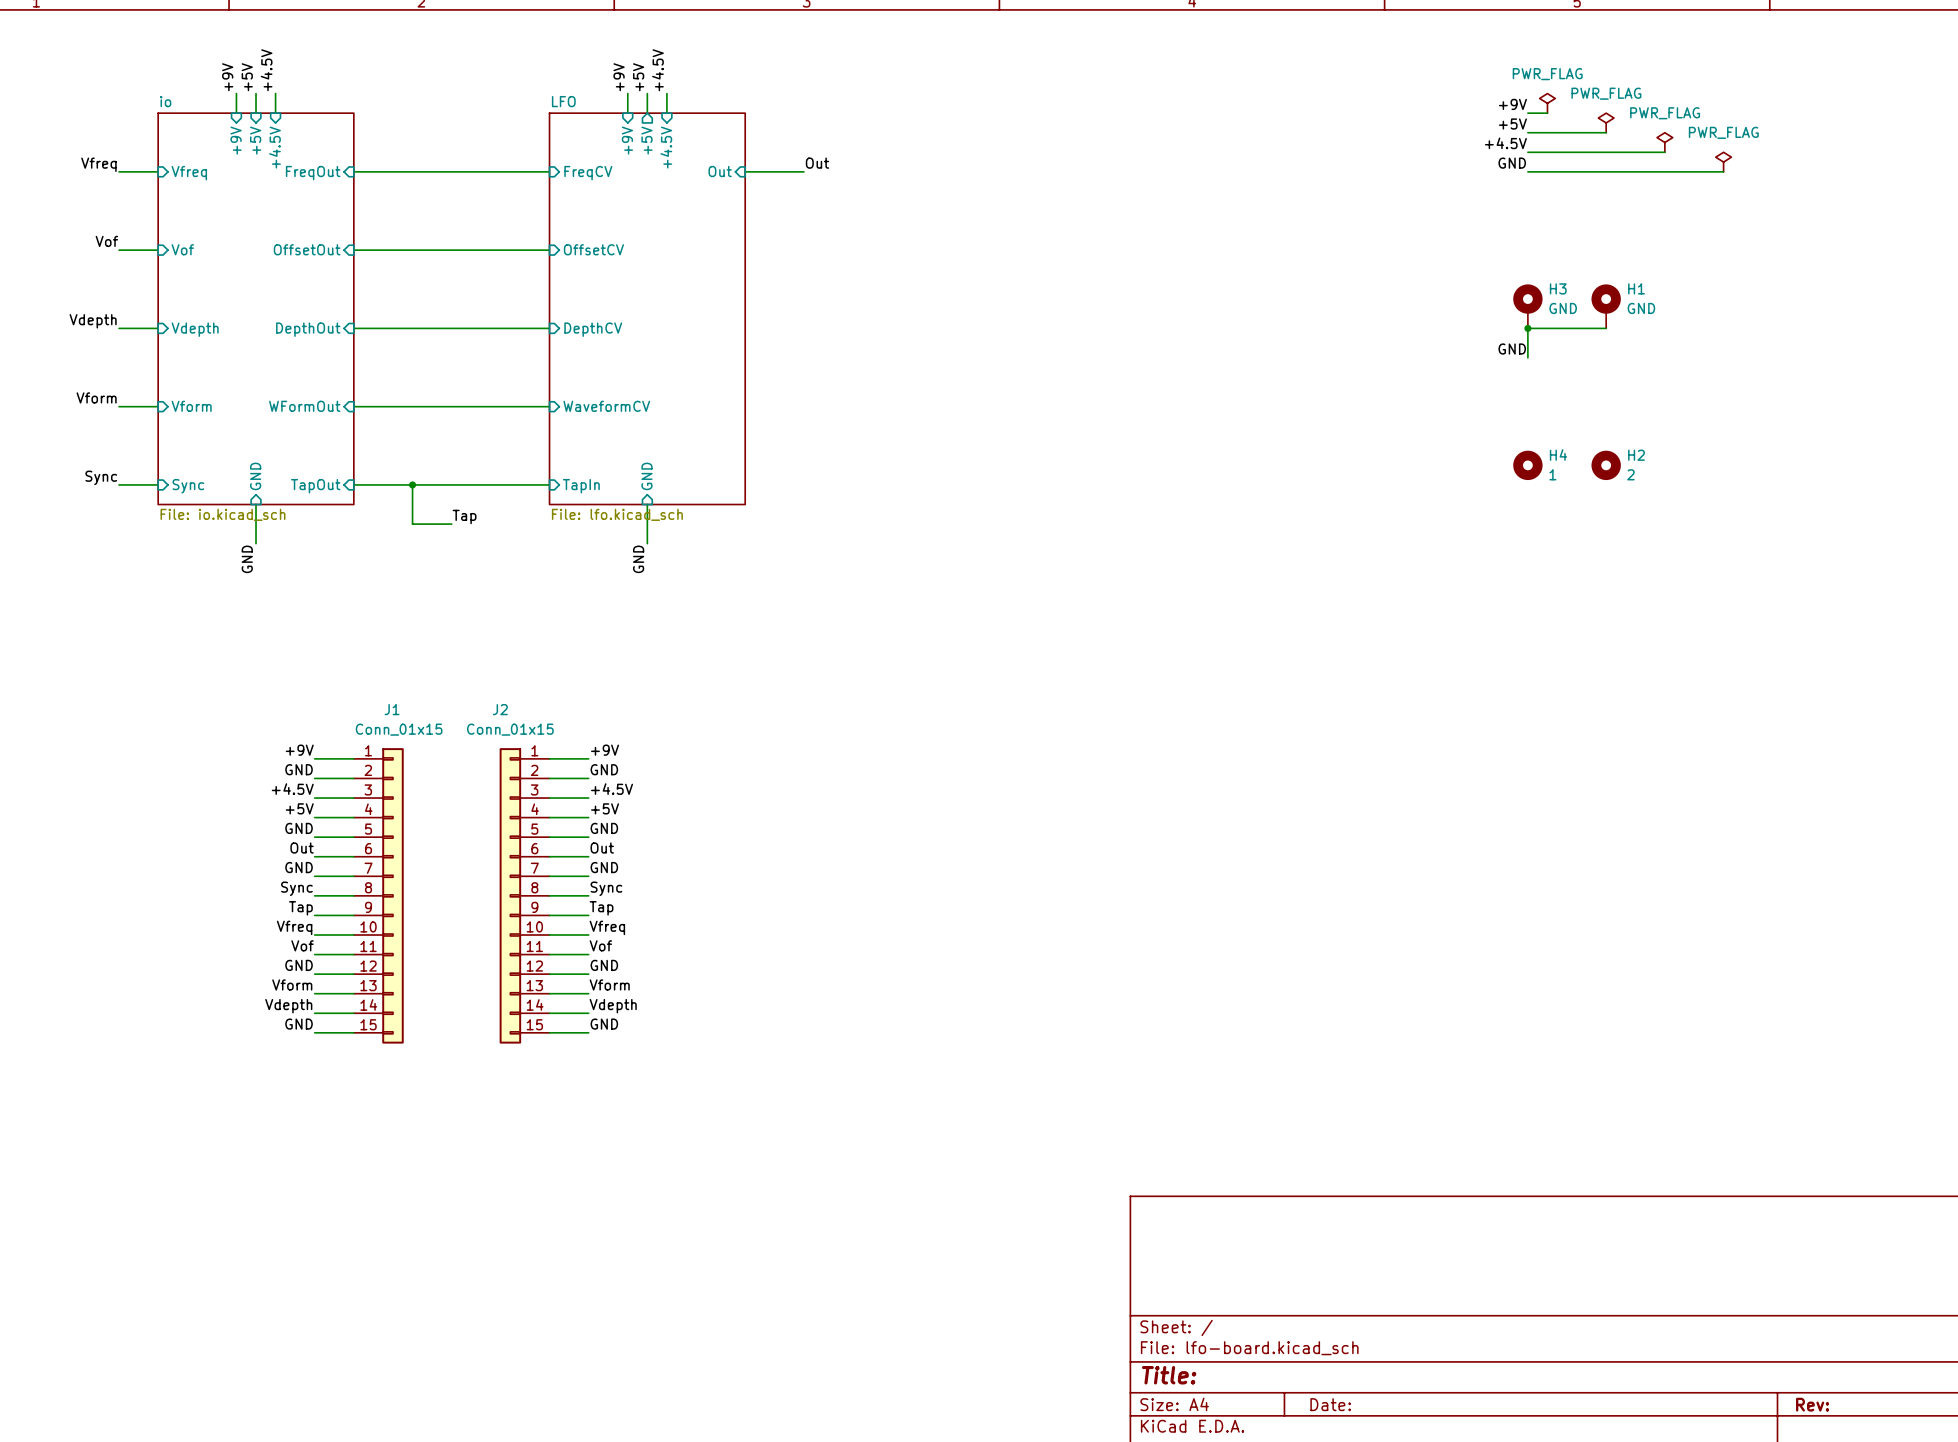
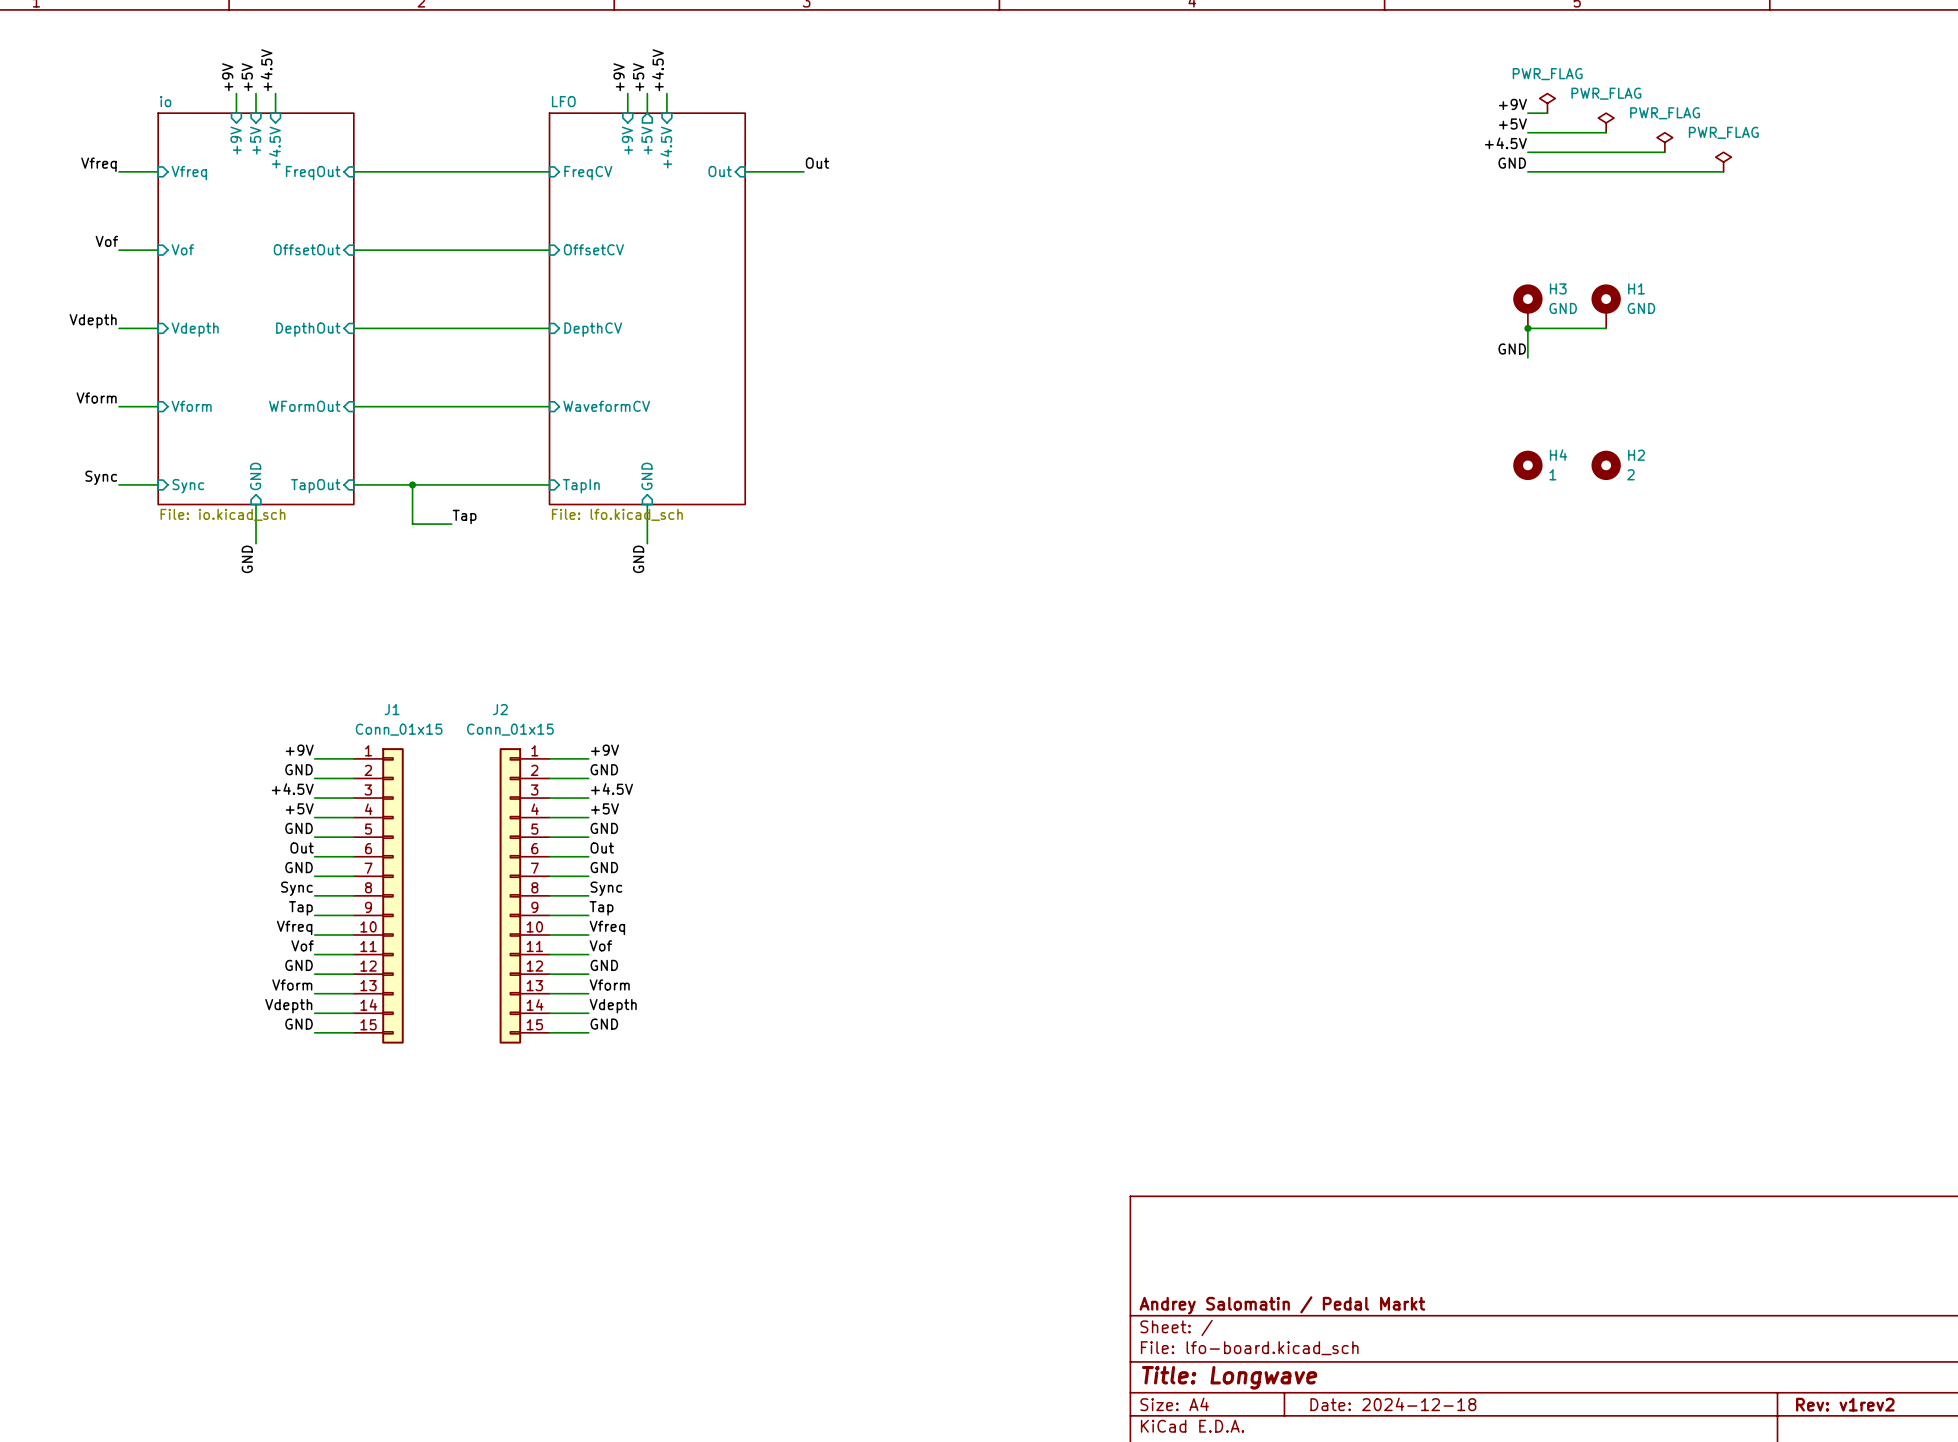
title block: none -> Andrey Salomatin / Pedal Markt (1282, 1305)
title block: Title: (1169, 1375) -> Title: Longwave (1229, 1377)
title block: Date: (1330, 1404) -> Date: 2024-12-18 (1393, 1404)
title block: Rev: (1812, 1404) -> Rev: v1rev2 (1845, 1404)

